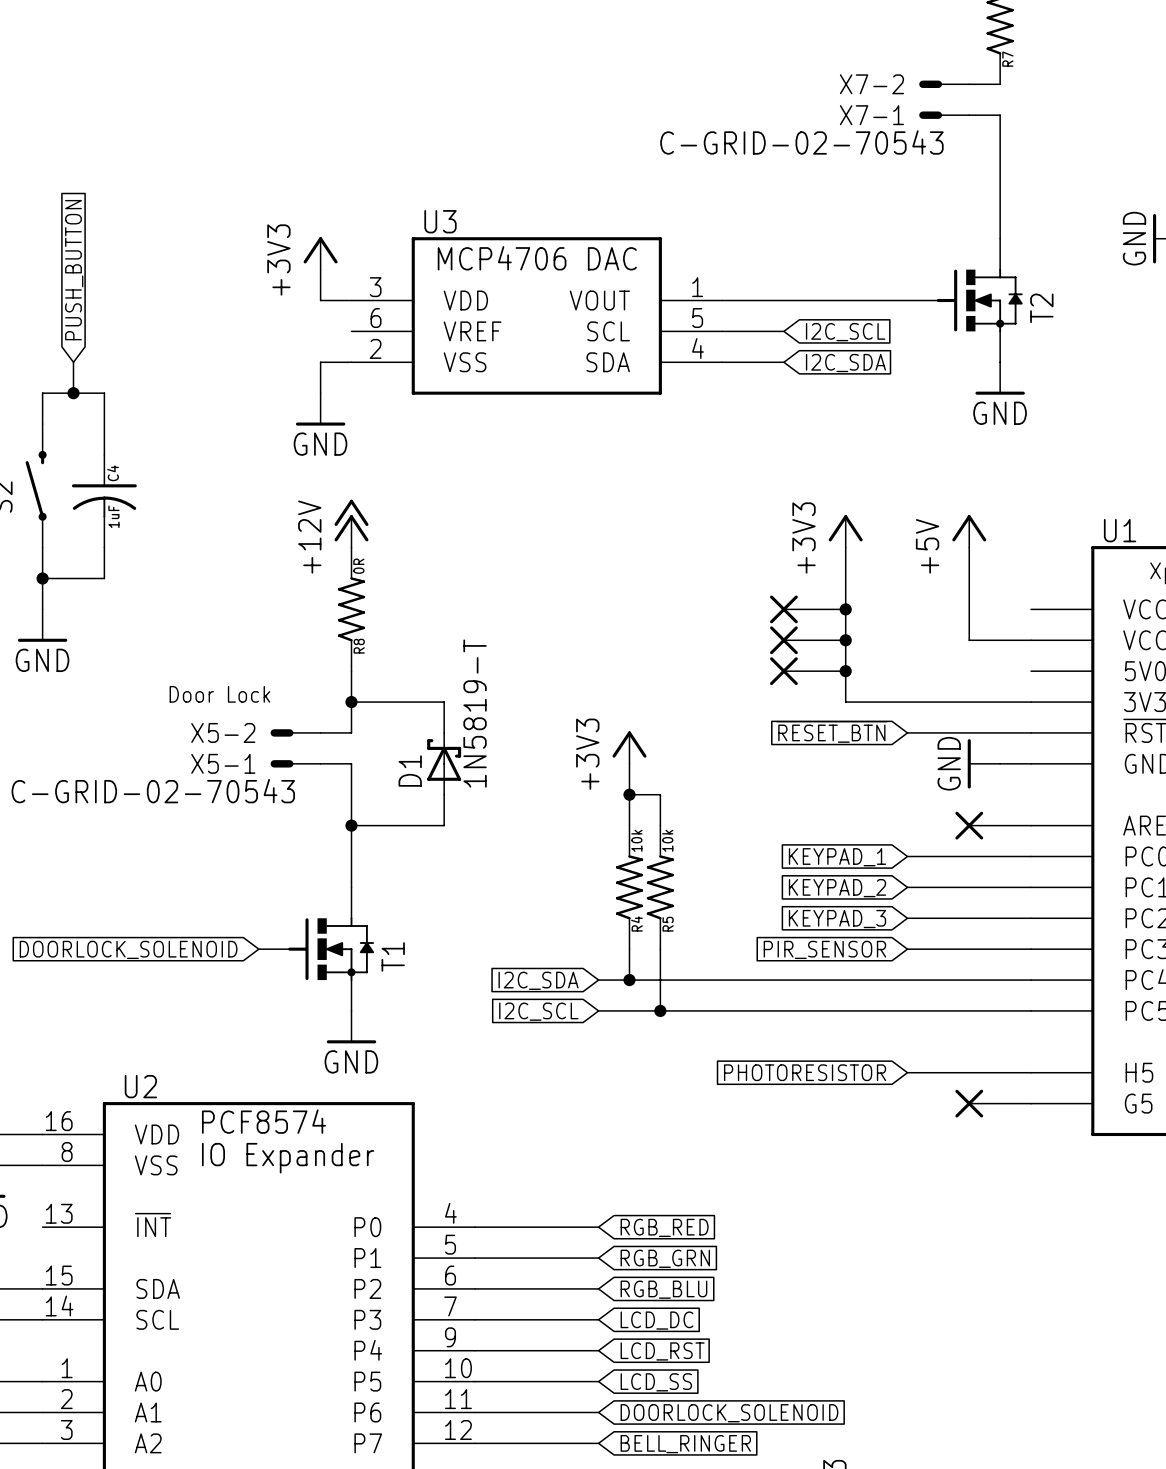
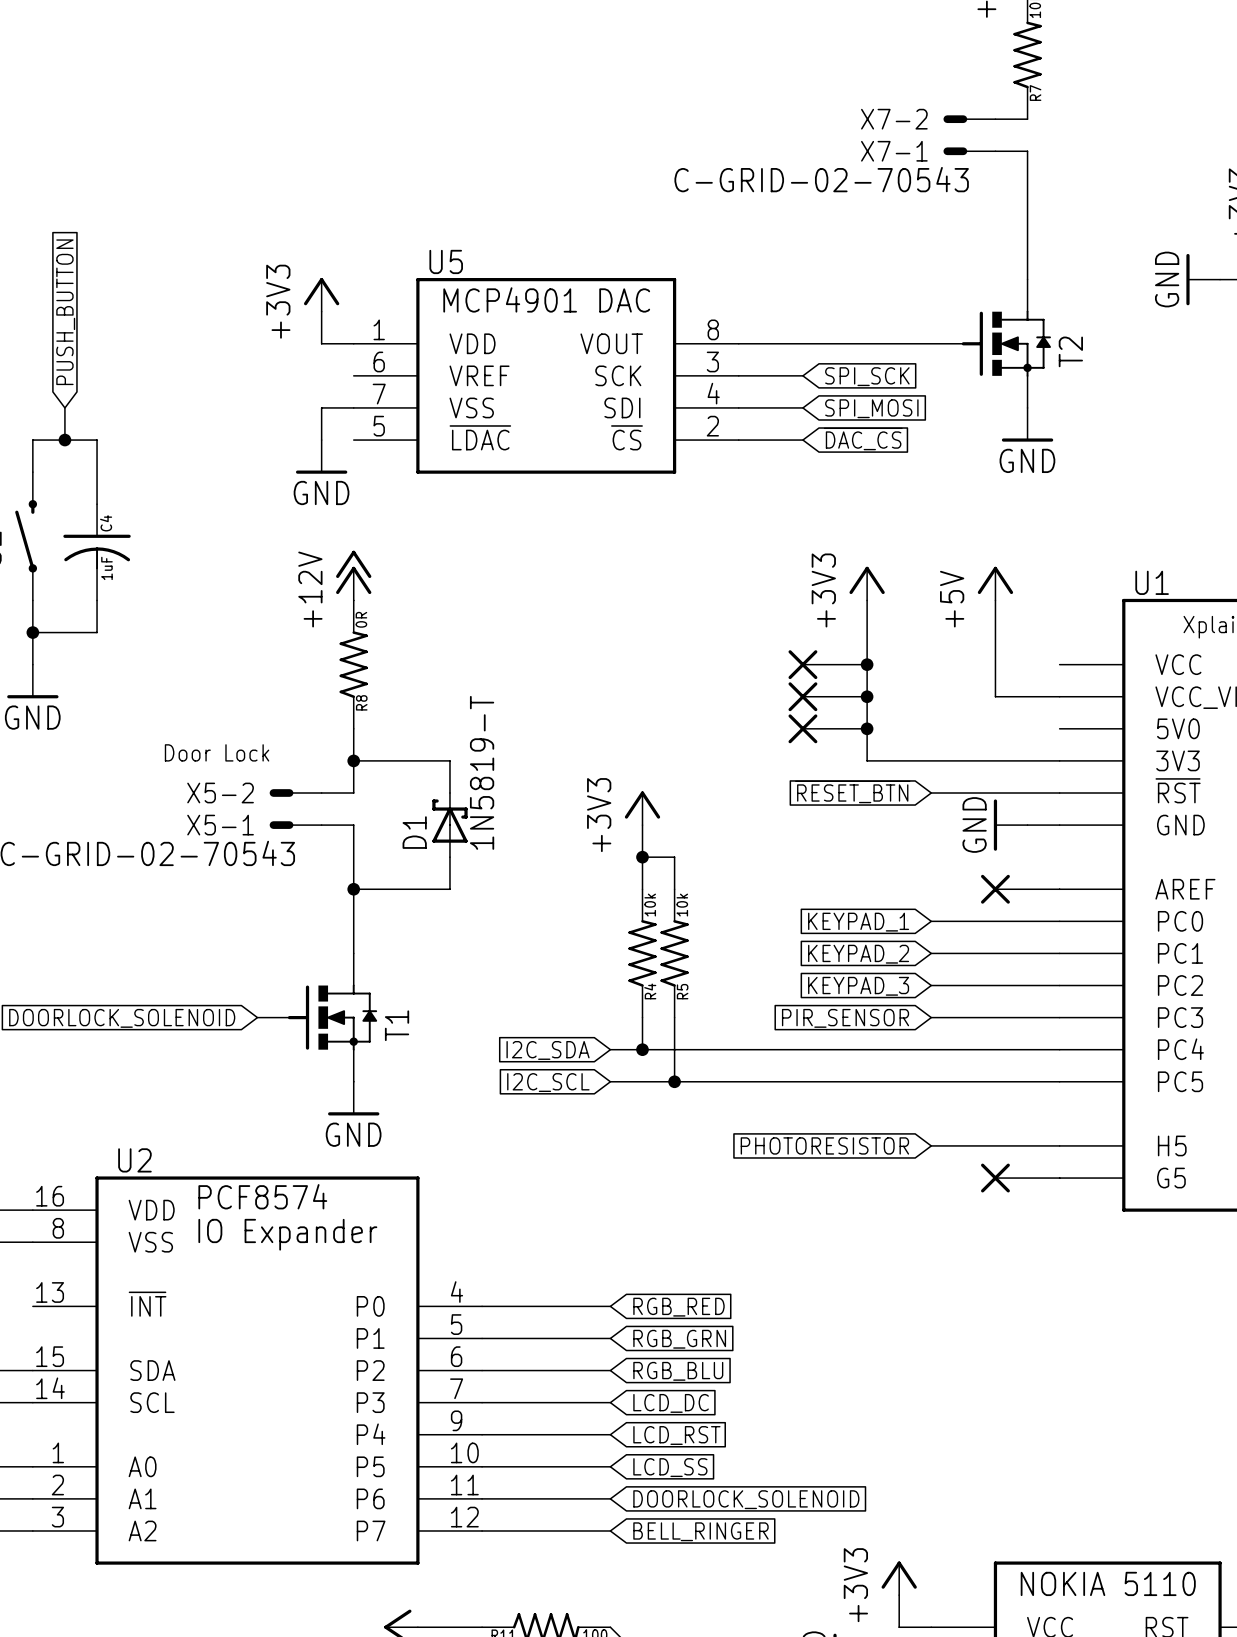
U3: (536, 315) -> none
U5: none -> (546, 375)
global label: I2C_SCL (845, 332) -> SPI_SCK (867, 376)
global label: I2C_SDA (845, 363) -> SPI_MOSI (871, 408)
global label: none -> ~{DAC_CS} (863, 438)
wire: none -> (738, 440) (802, 440)

